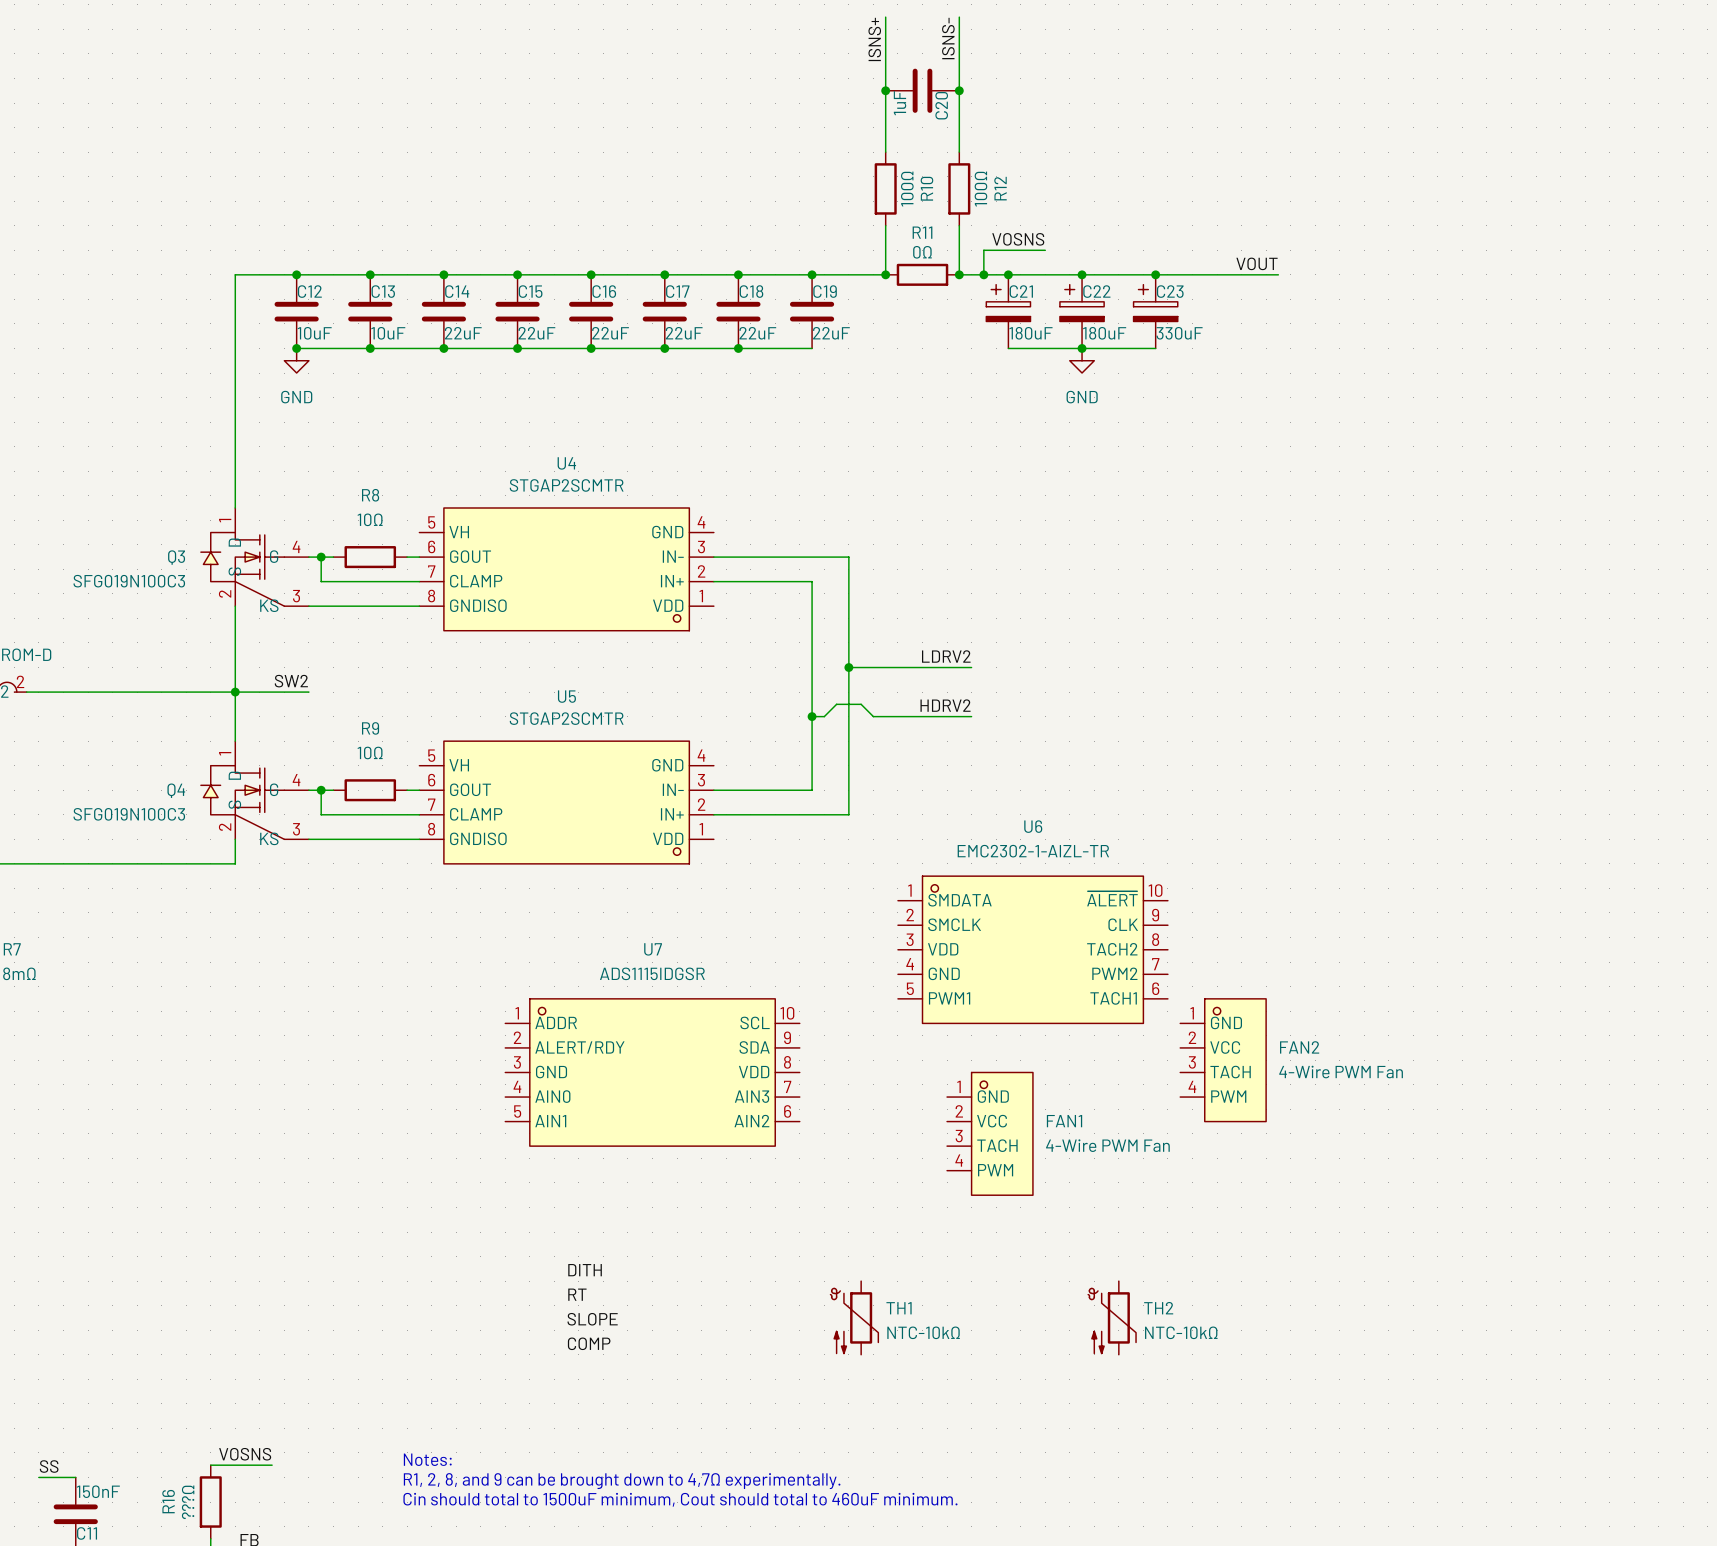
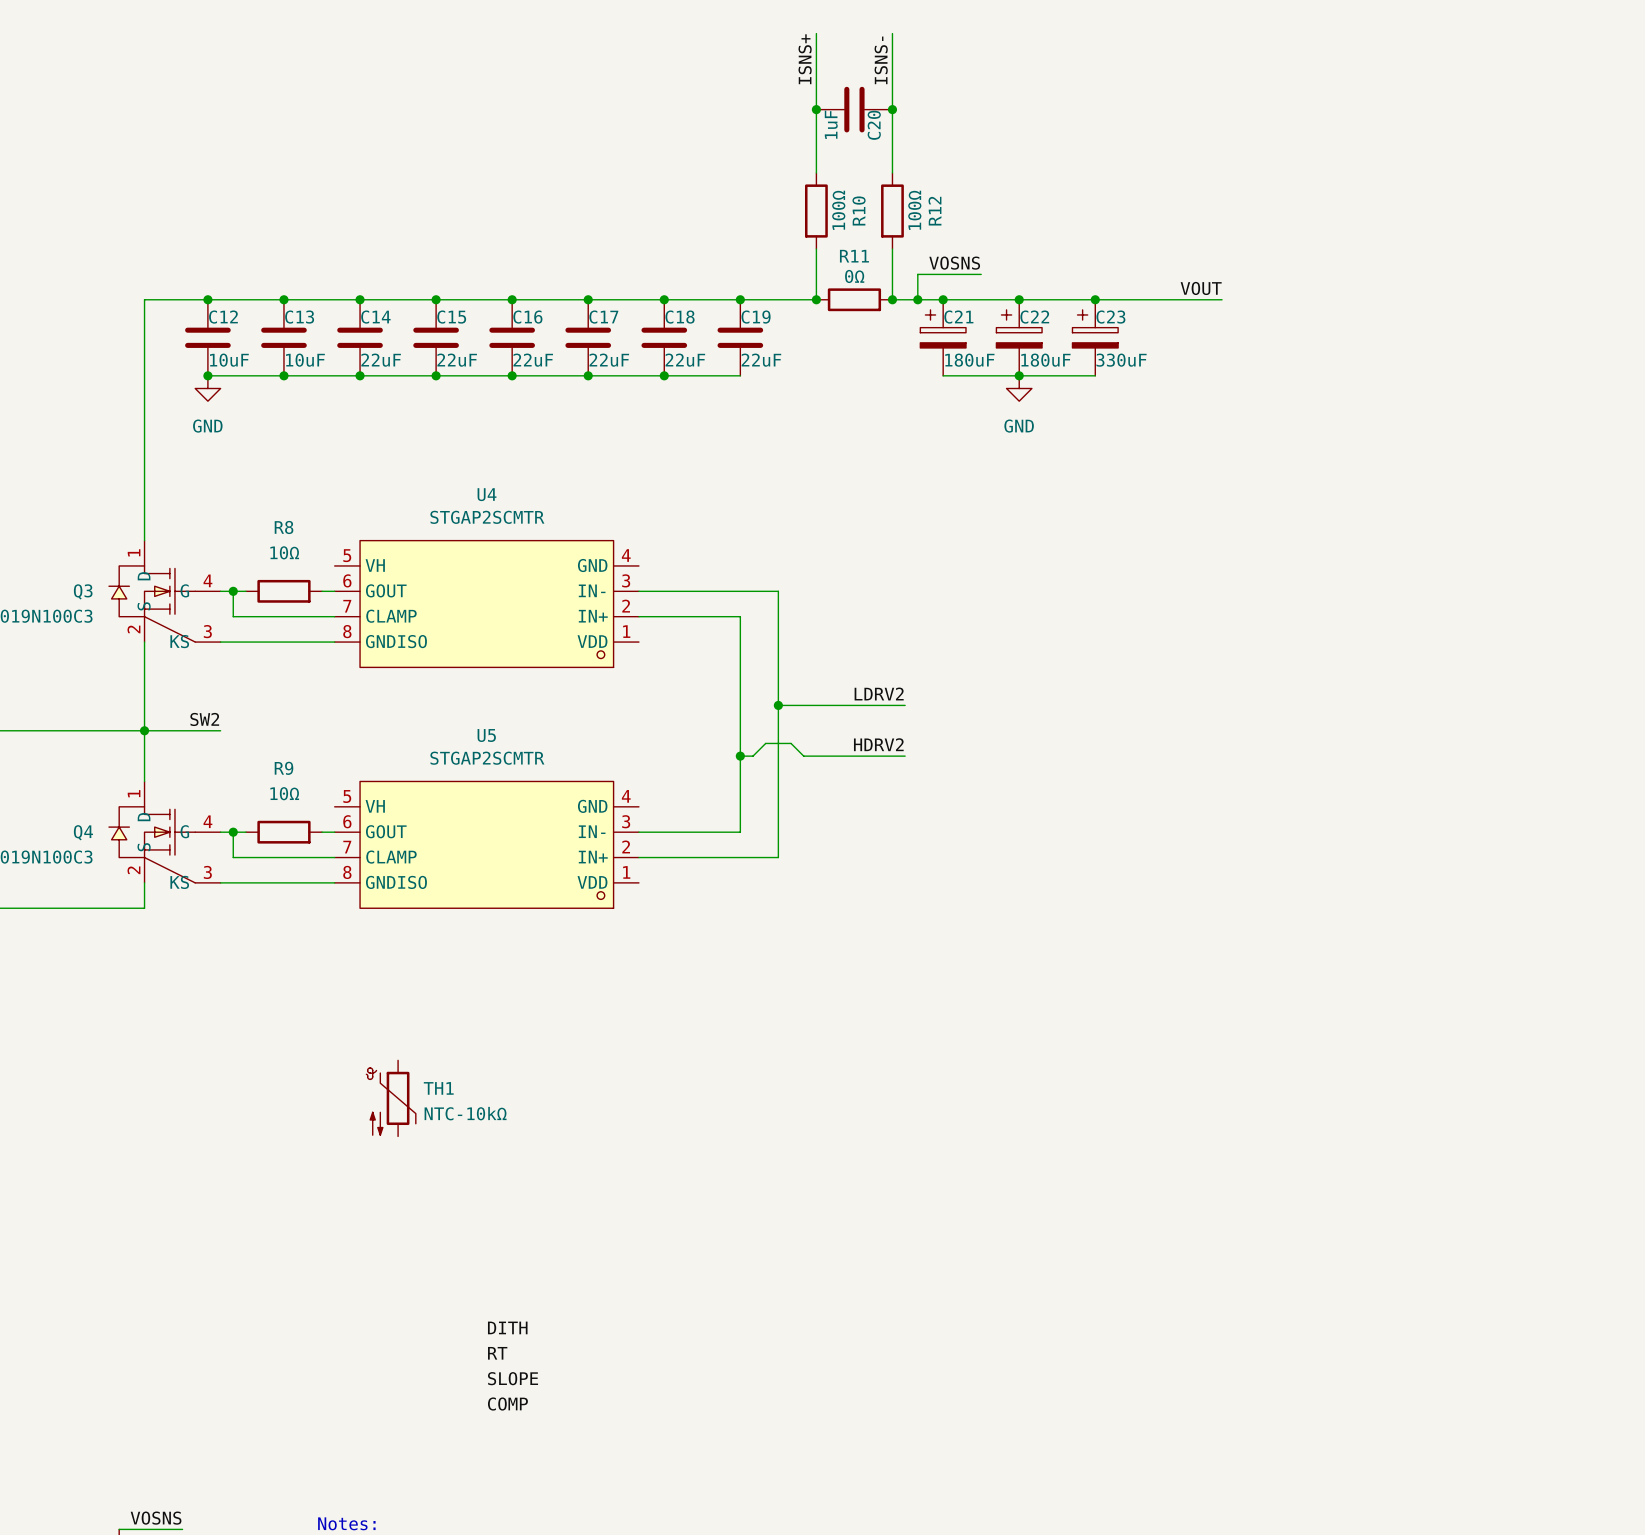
U6: EMC2302-1-AIZL-TR (1032, 949) -> none
FAN2: 4-Wire PWM Fan (1223, 1060) -> none
U7: ADS1115IDGSR (652, 1072) -> none
FAN1: 4-Wire PWM Fan (989, 1133) -> none
TH1 position: (854, 1317) -> (391, 1098)
TH2: NTC-10kΩ (1112, 1317) -> none

